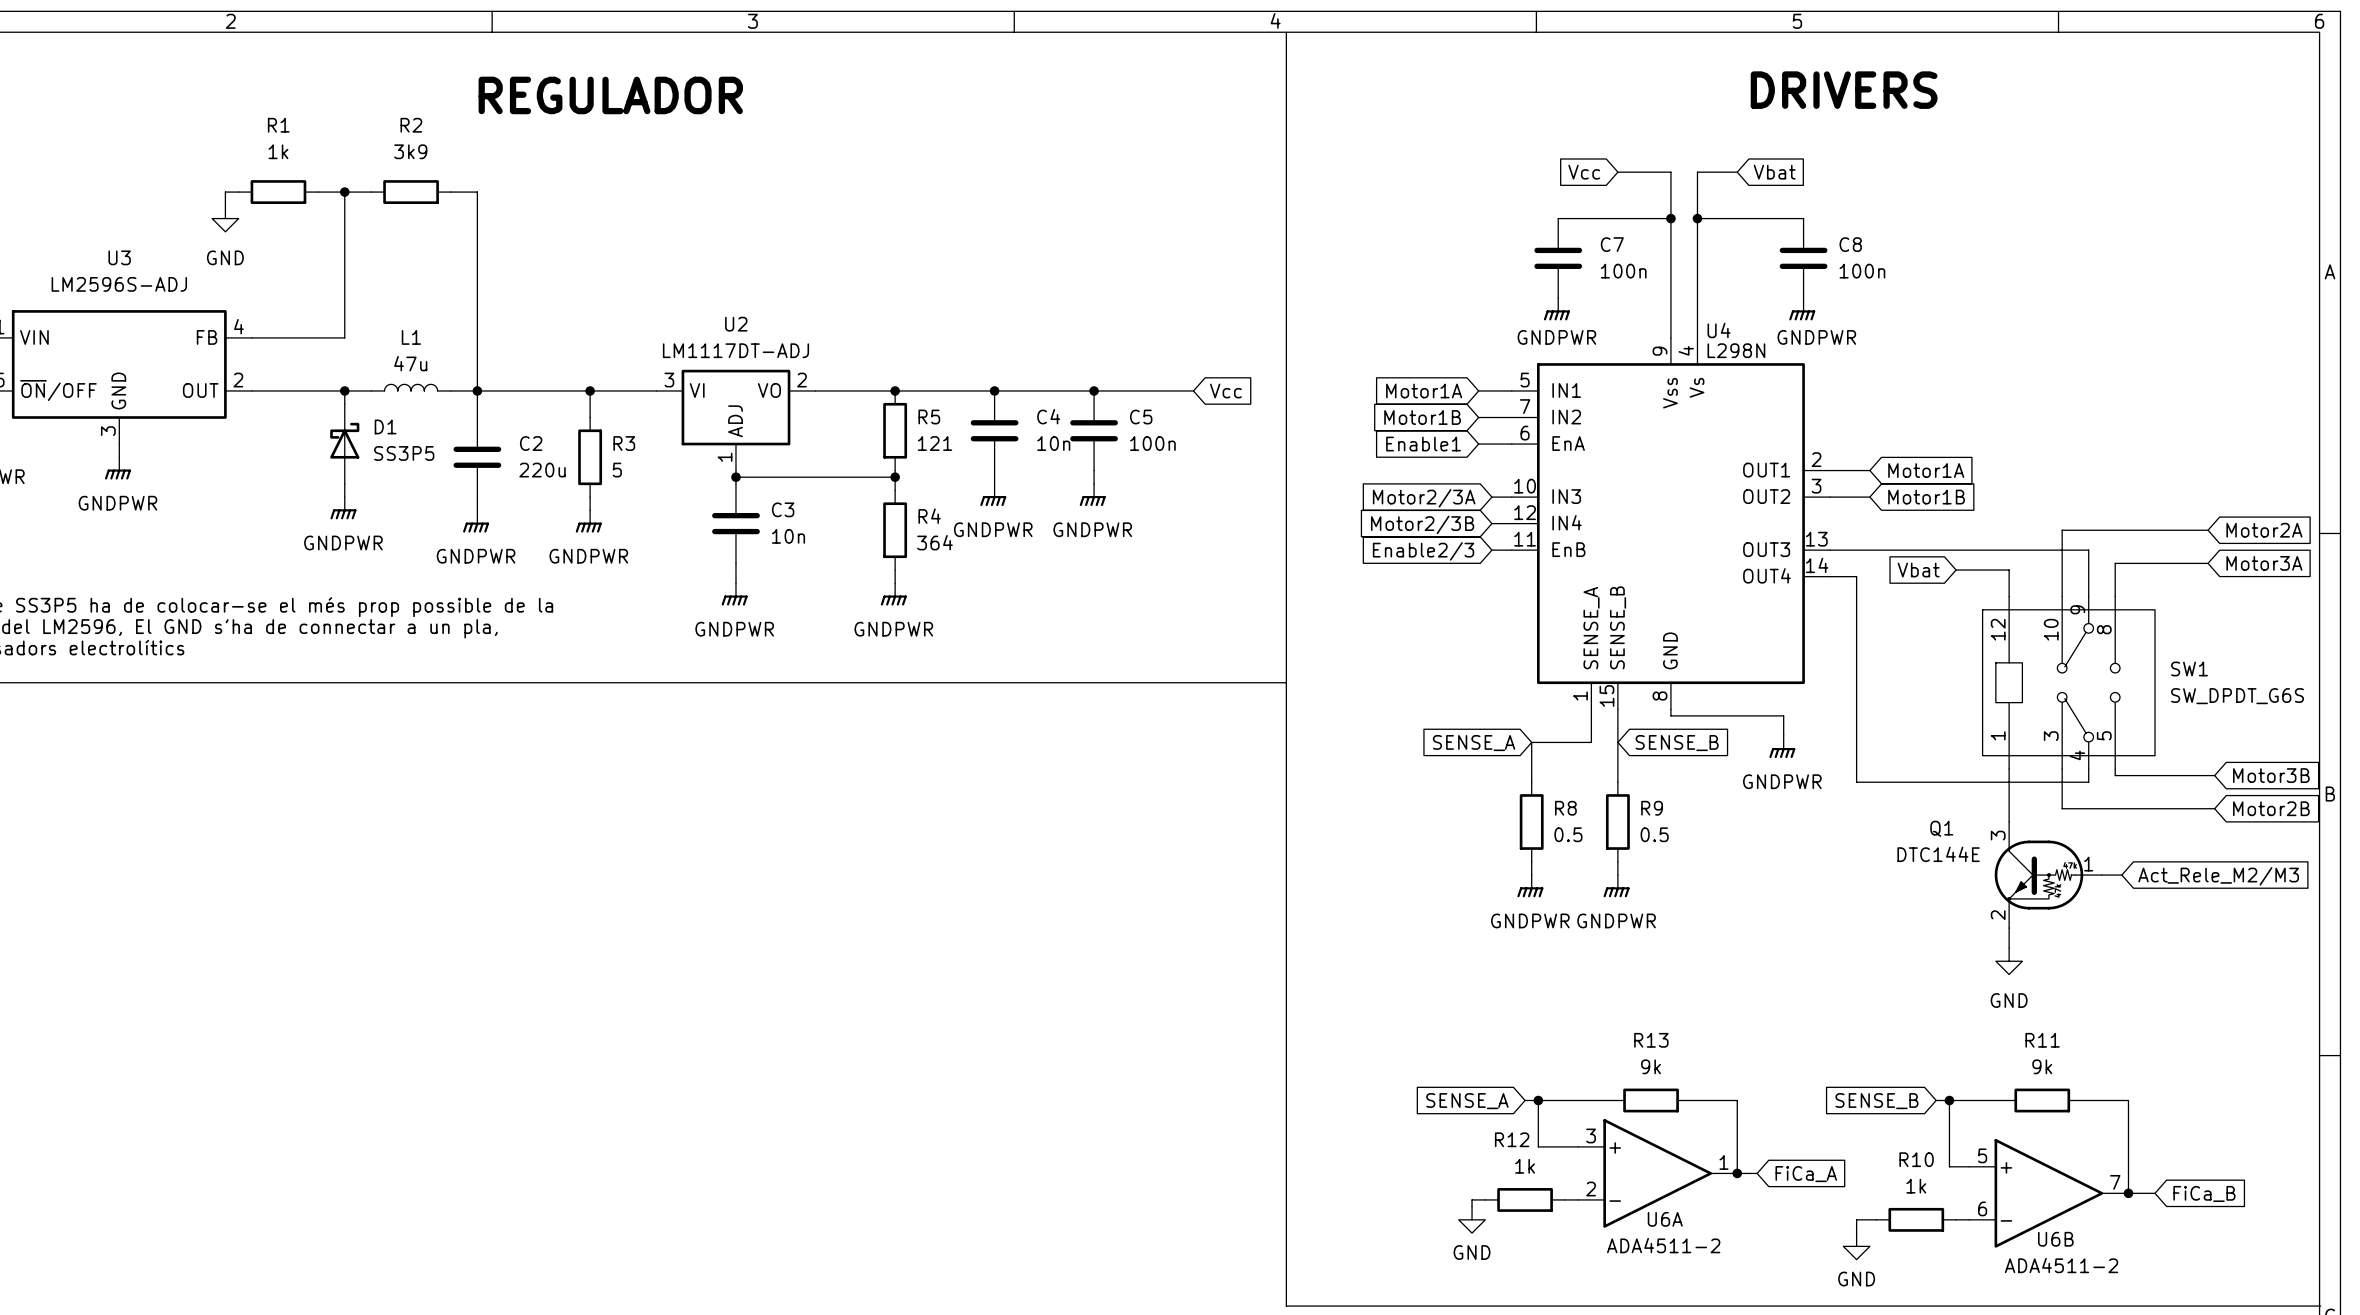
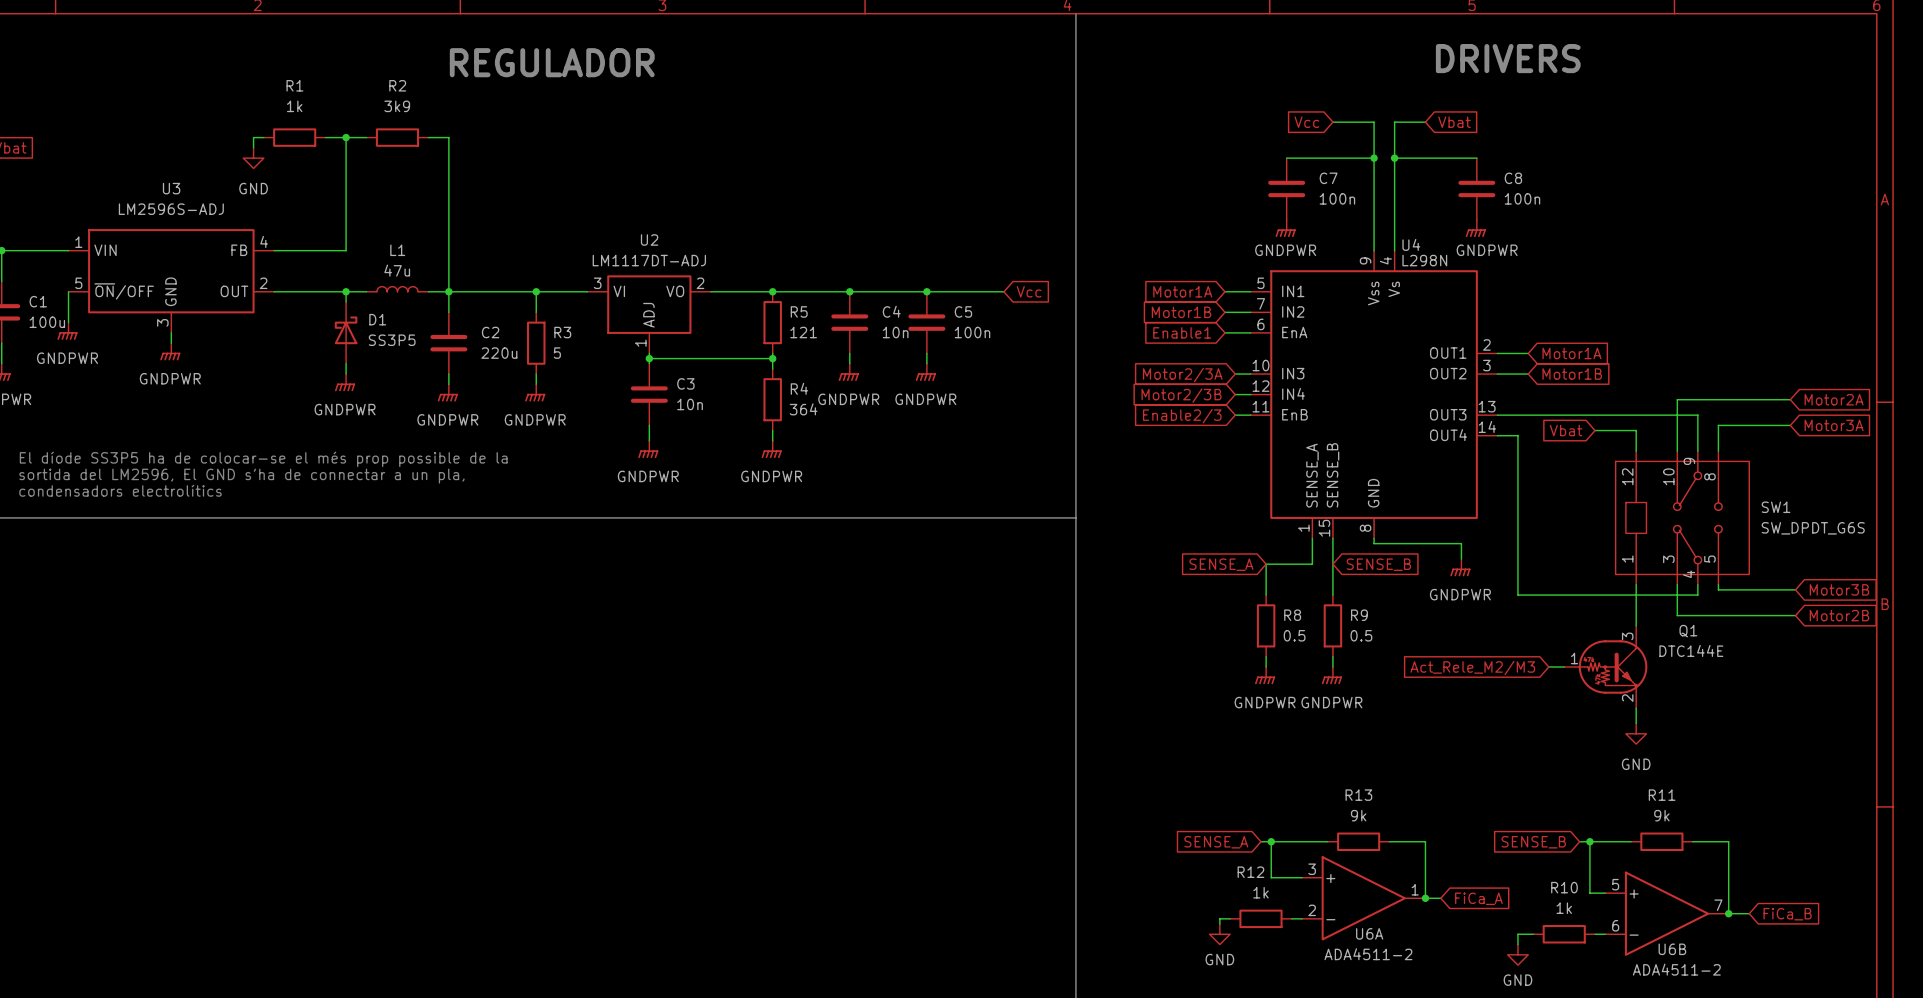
Q1 flip: as is (2038, 875) -> left-right (1613, 666)
Q1 position: (2048, 875) -> (1605, 666)
wire: (2101, 875) (2121, 875) -> (1548, 666) (1564, 666)
global label rotation: 0° (2218, 876) -> 180° (1472, 667)
global label position: Act_Rele_M2/M3 (2218, 876) -> Act_Rele_M2/M3 (1472, 667)

